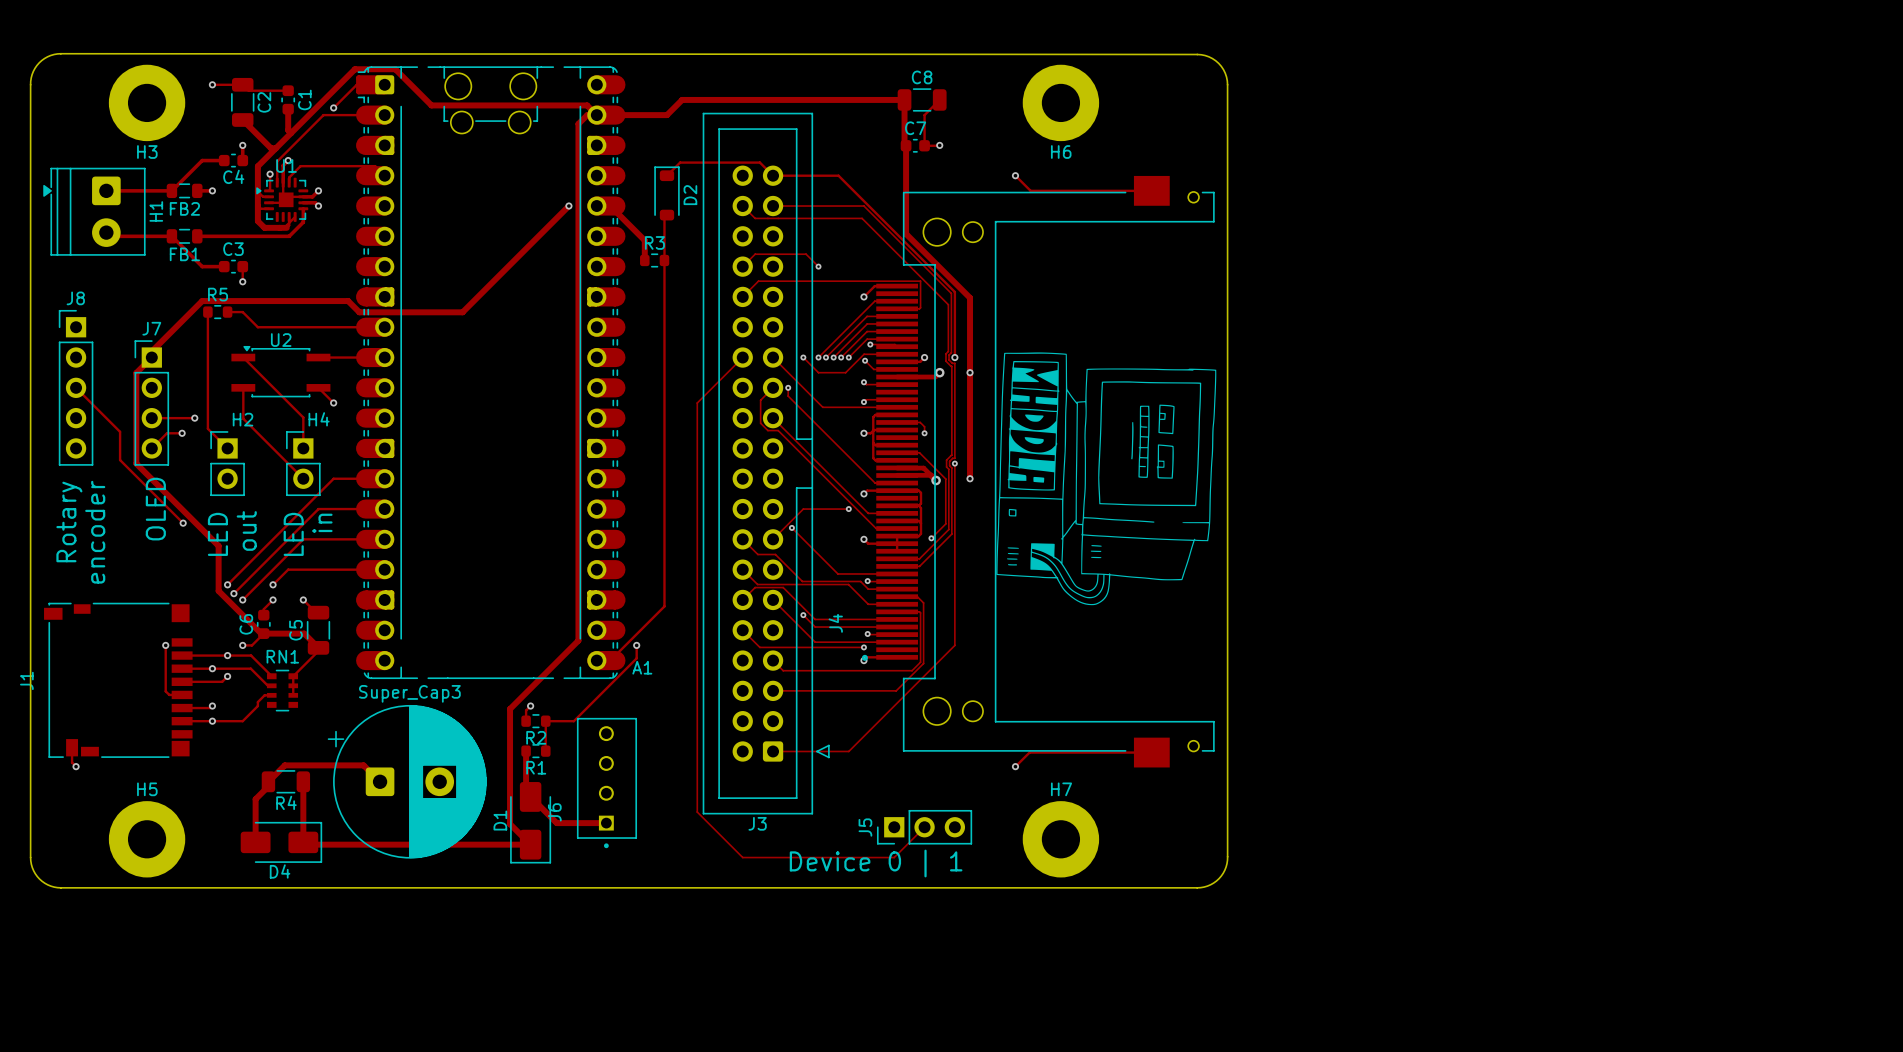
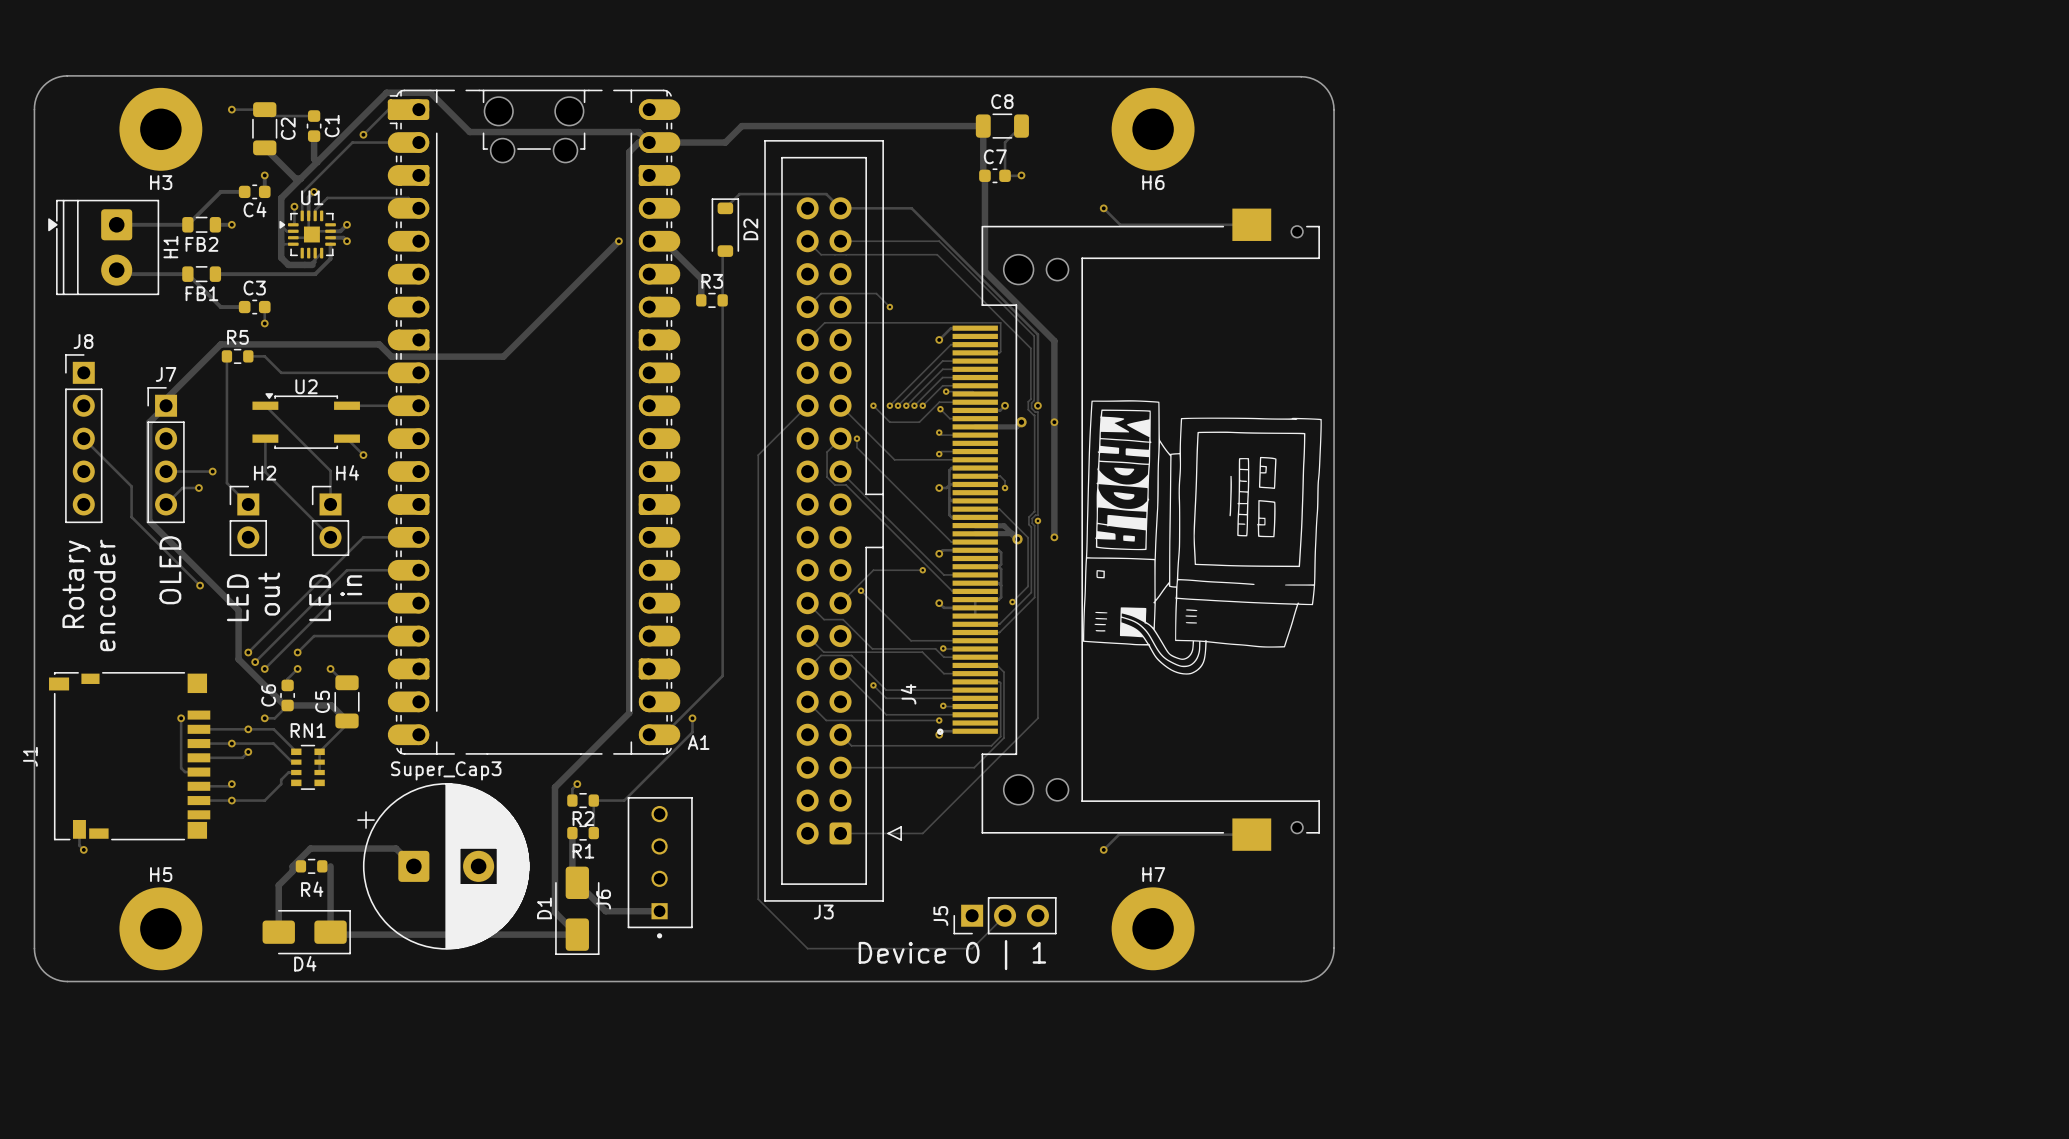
R4 footprint: [261, 770, 311, 794] -> [295, 858, 328, 874]

